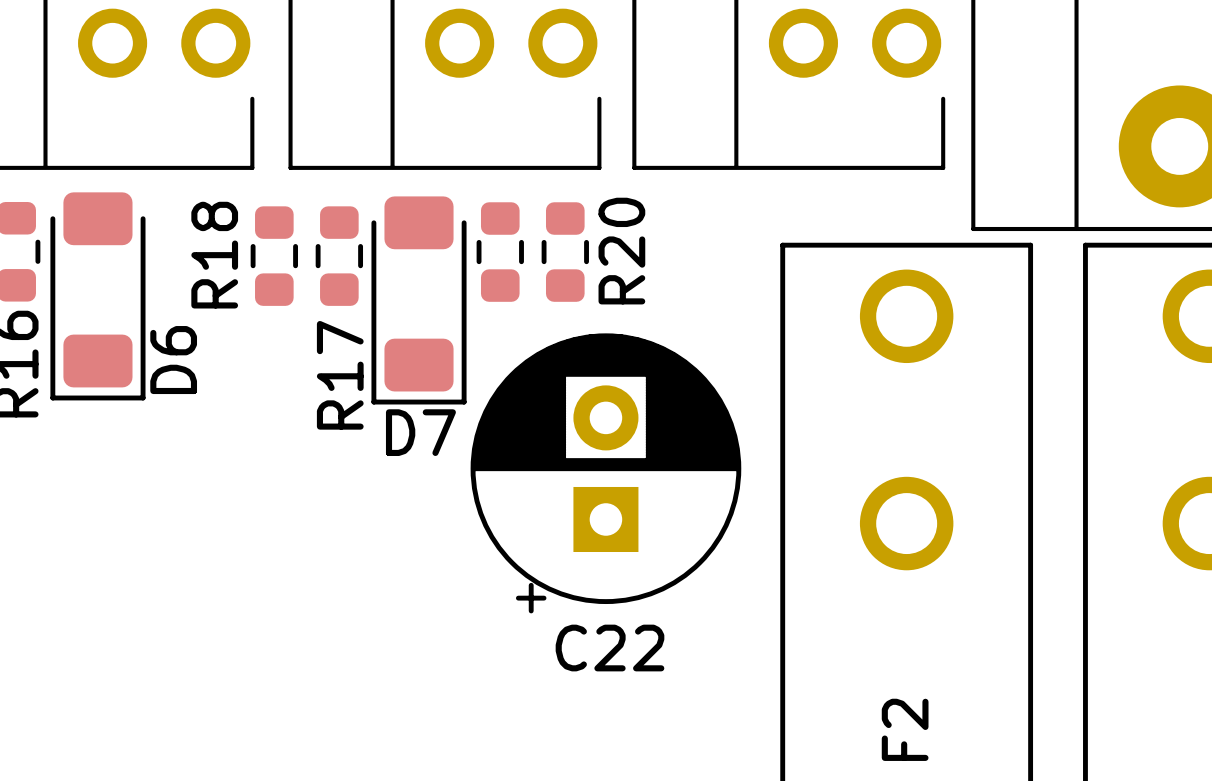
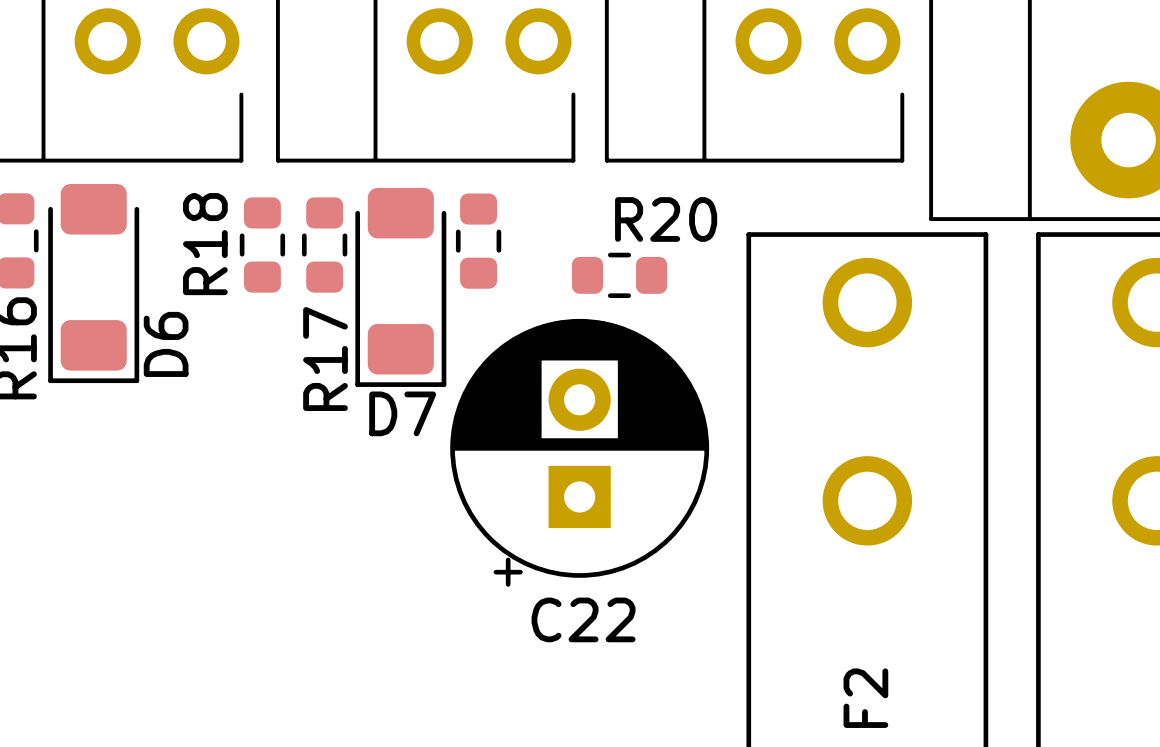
R20 rotation: 0° (565, 252) -> 90° clockwise (619, 275)
R20 position: (565, 252) -> (619, 275)

